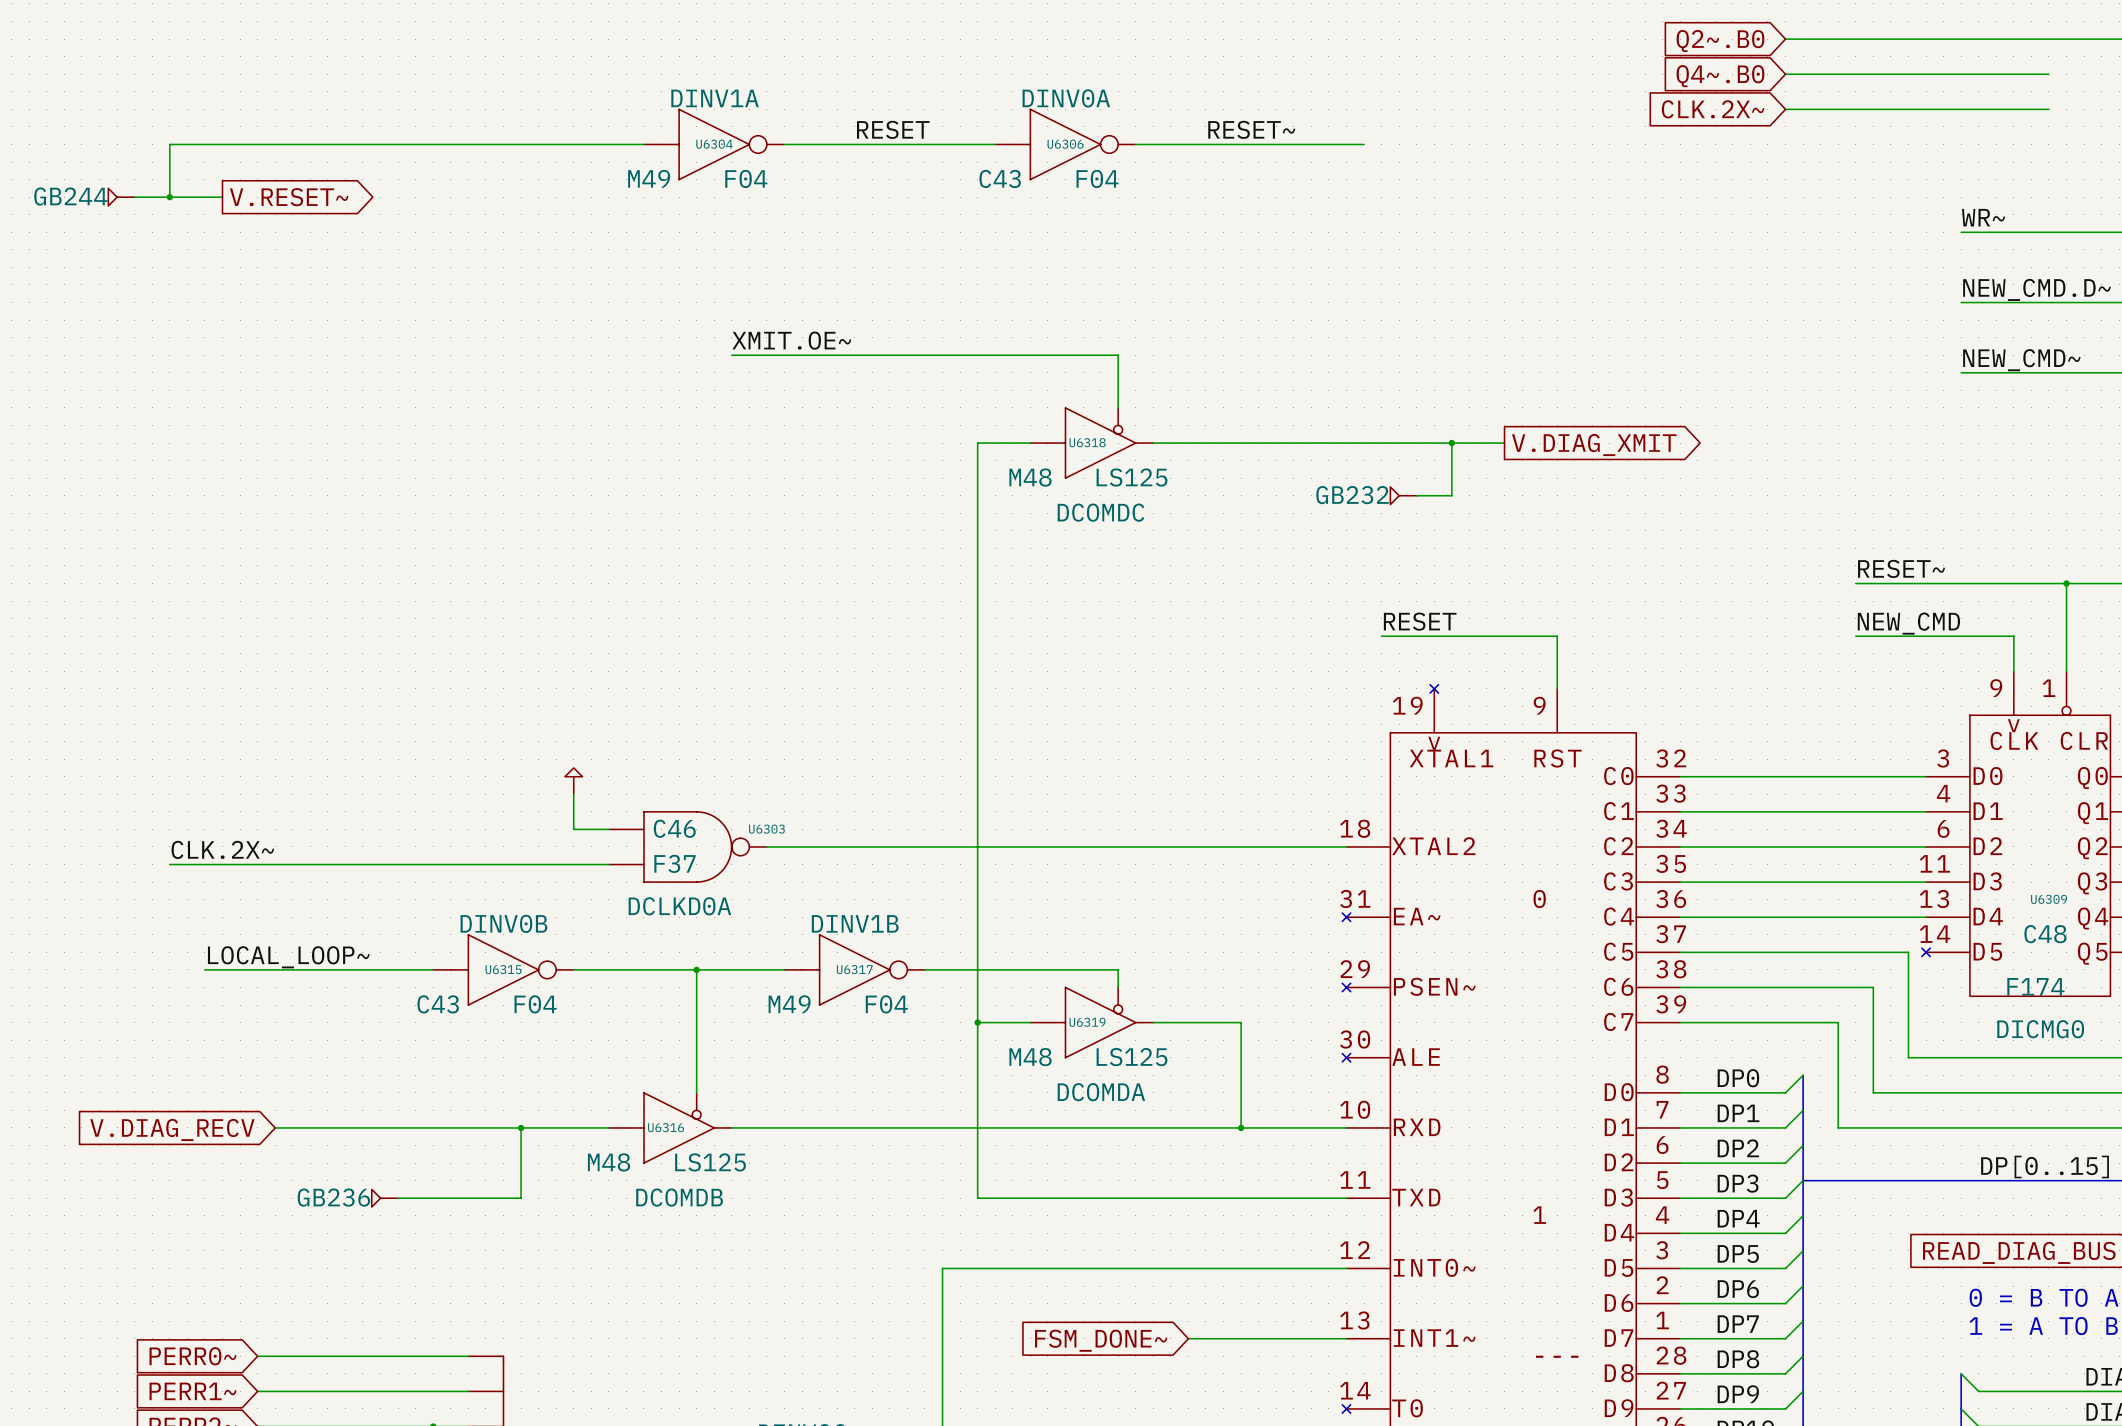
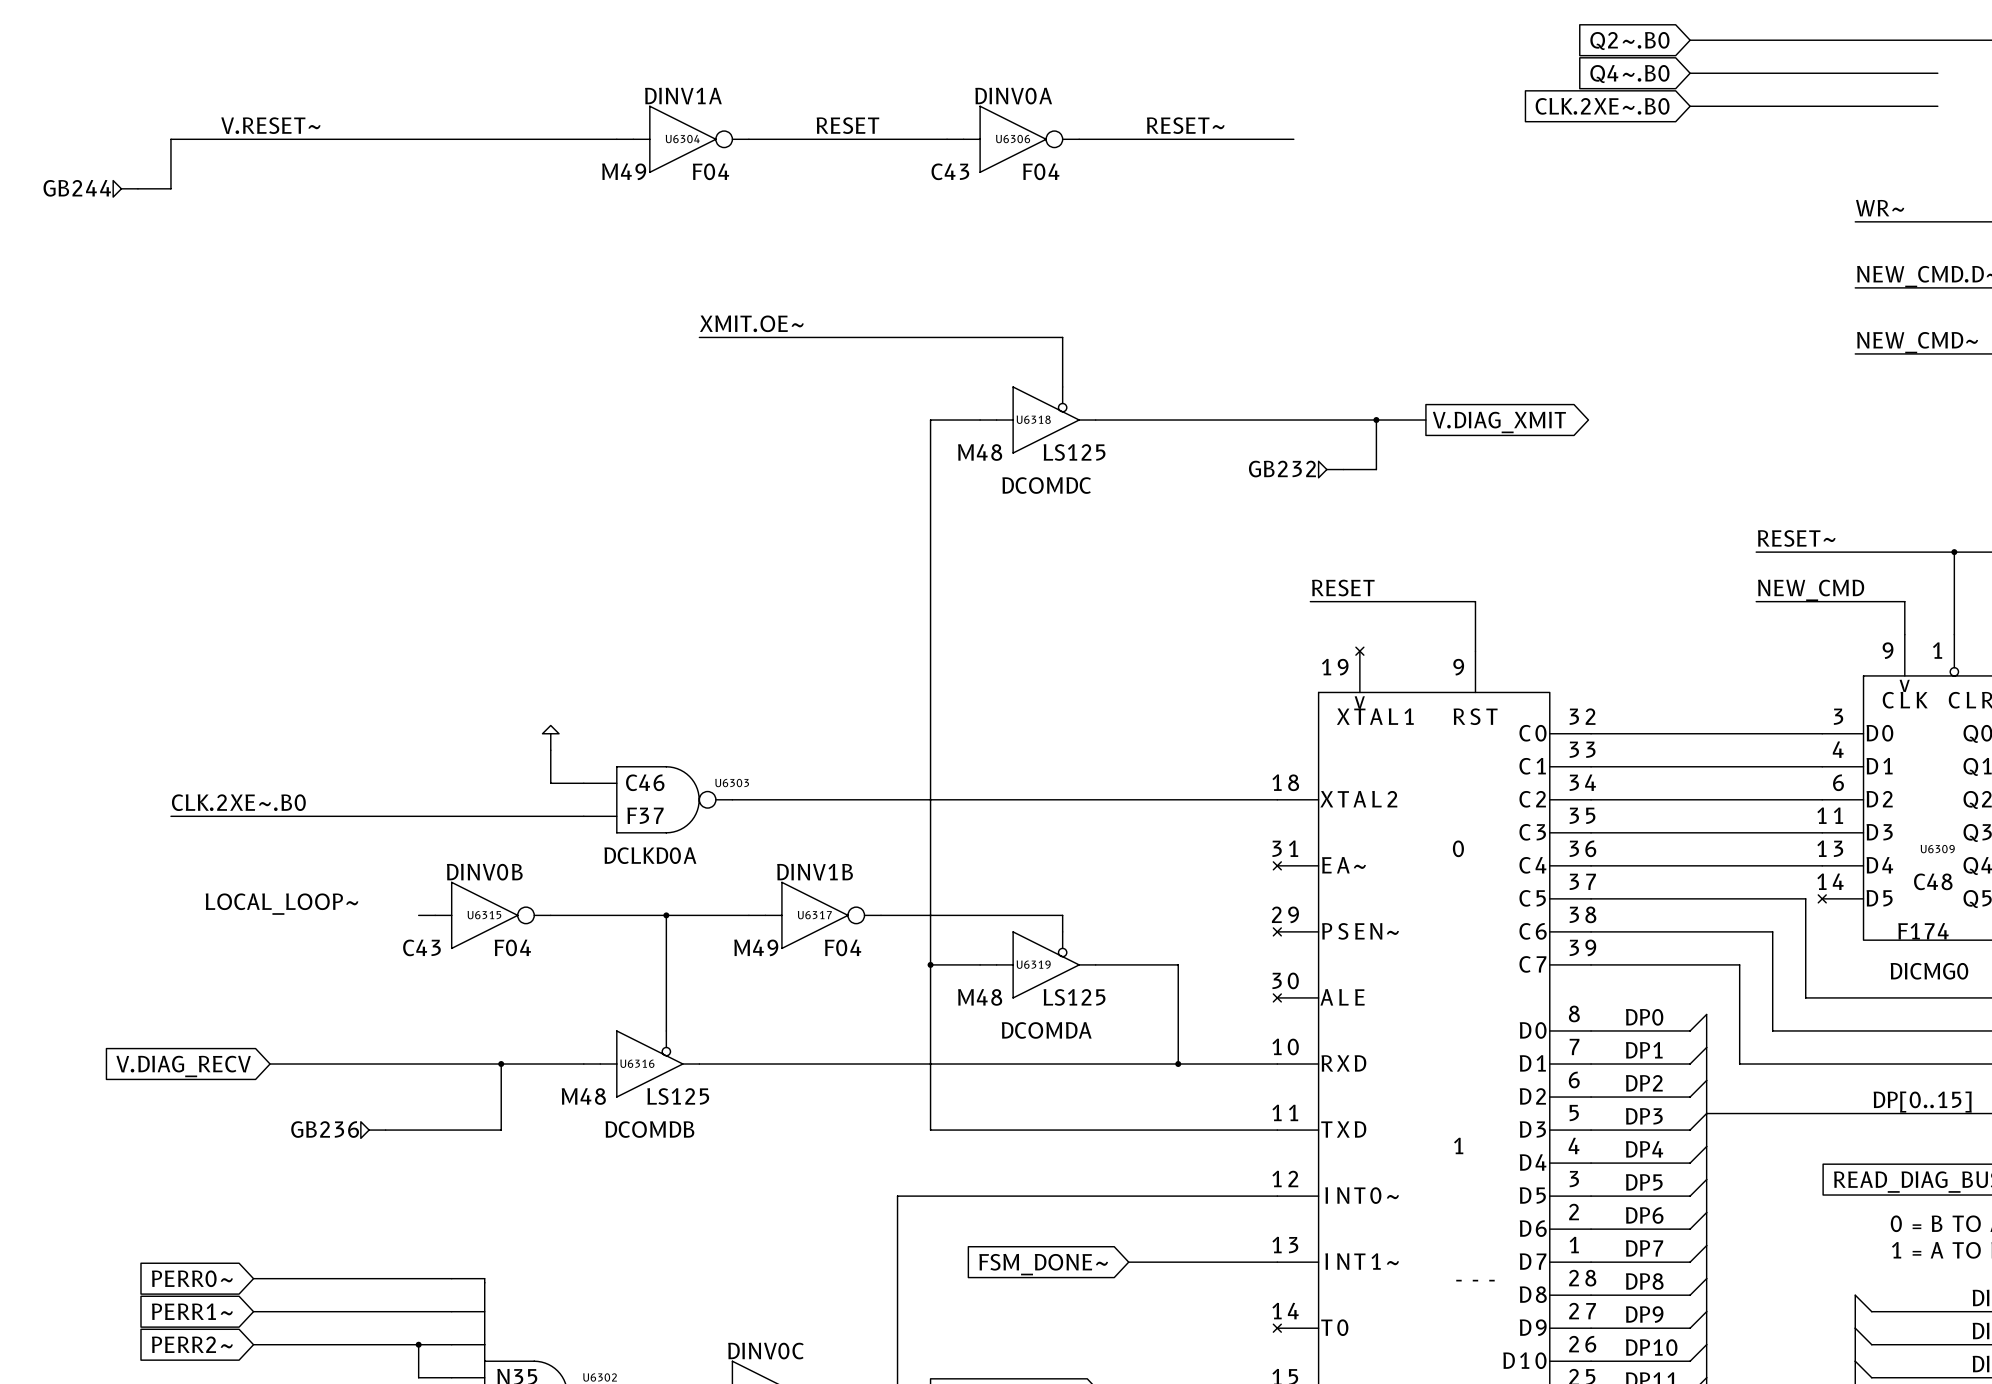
global label: CLK.2X~ (1713, 109) -> CLK.2XE~.B0 (1602, 106)
label: none -> V.RESET~ (270, 125)
wire: (169, 197) (222, 197) -> none
junction: (169, 197) -> none
global label: V.RESET~ (289, 197) -> none
label: CLK.2X~ (222, 849) -> CLK.2XE~.B0 (238, 802)
wire: (204, 969) (433, 969) -> none

